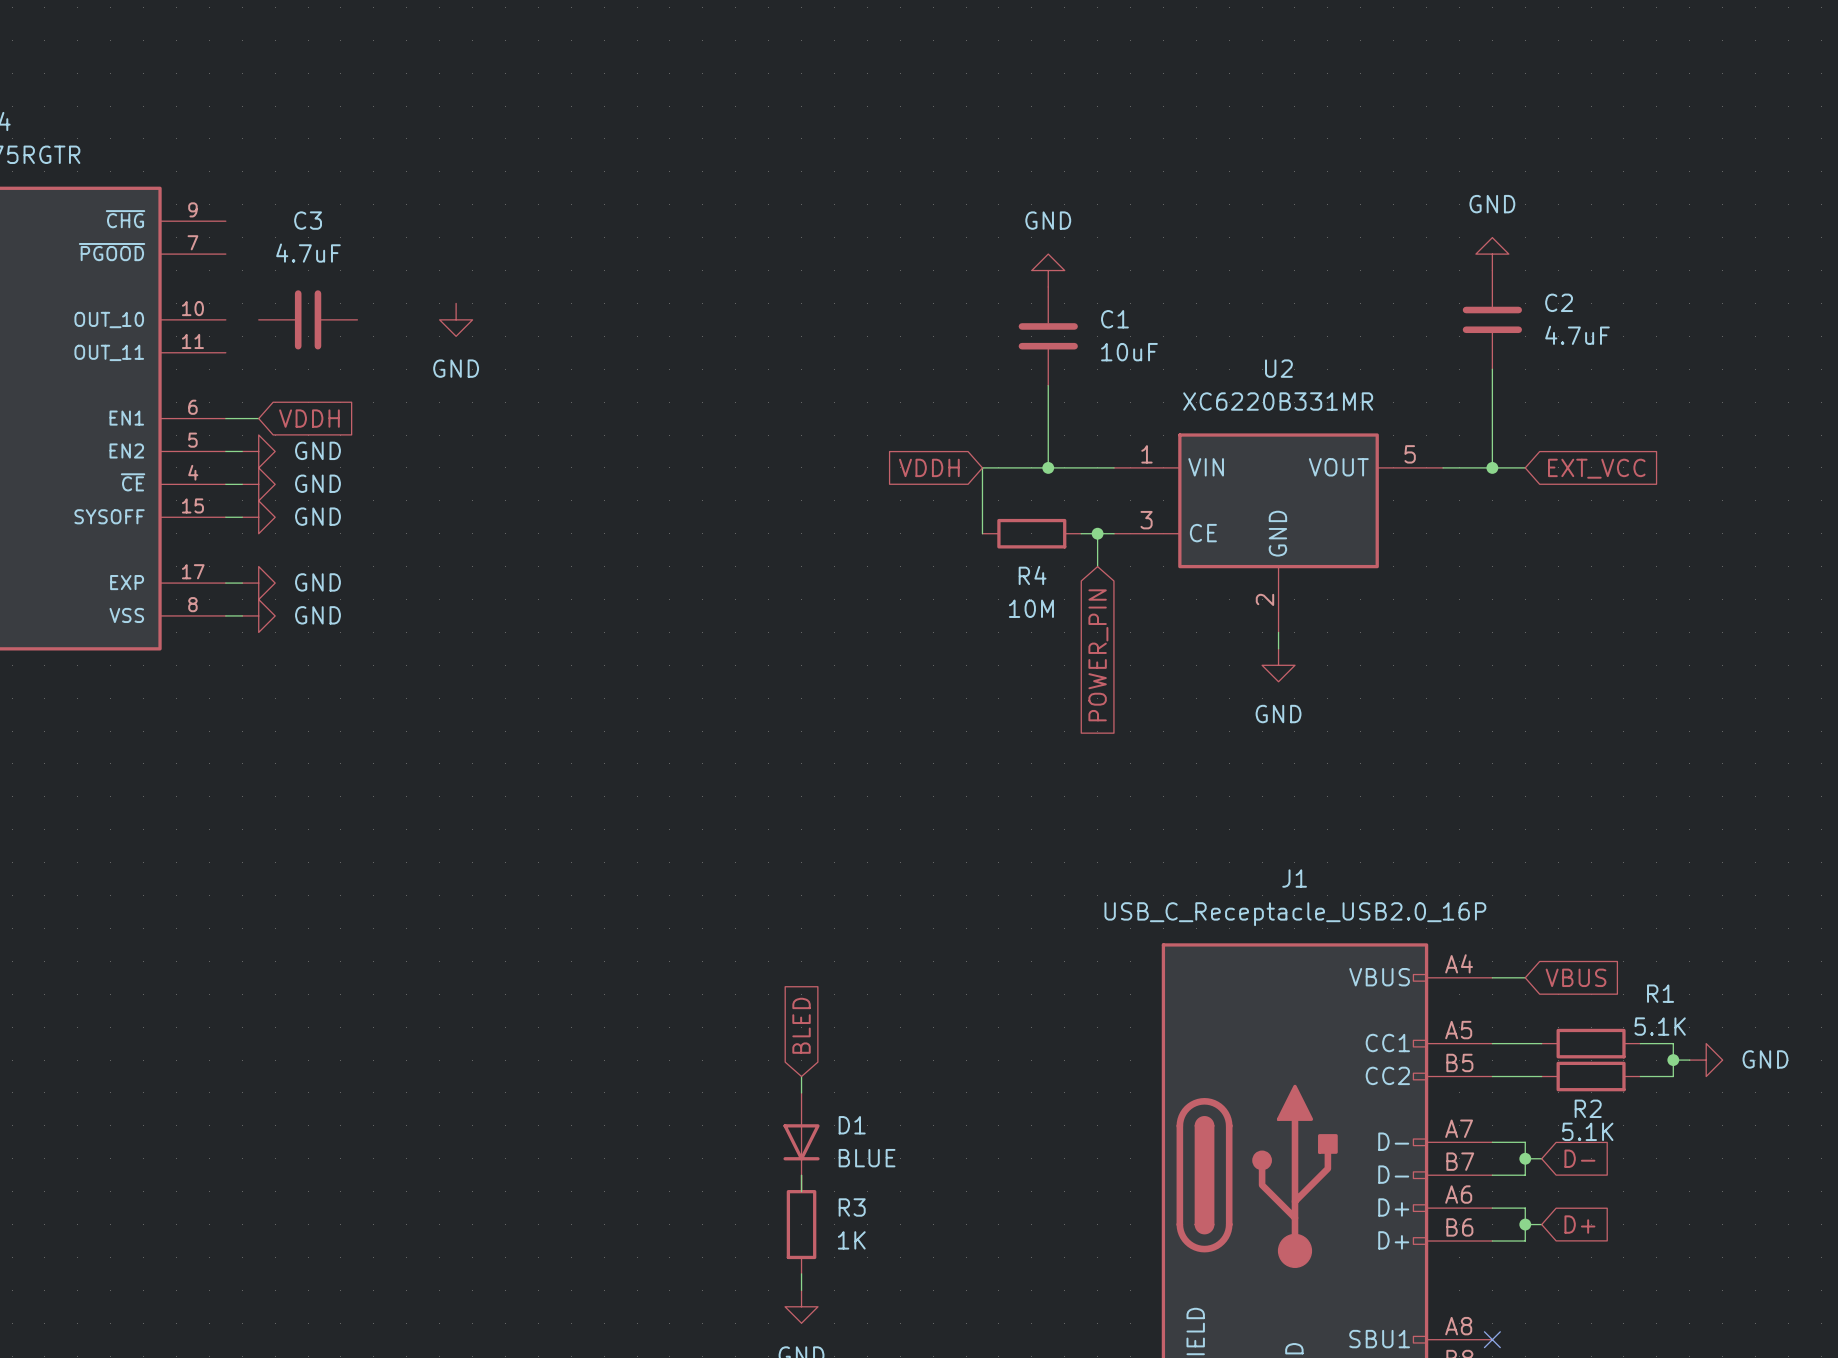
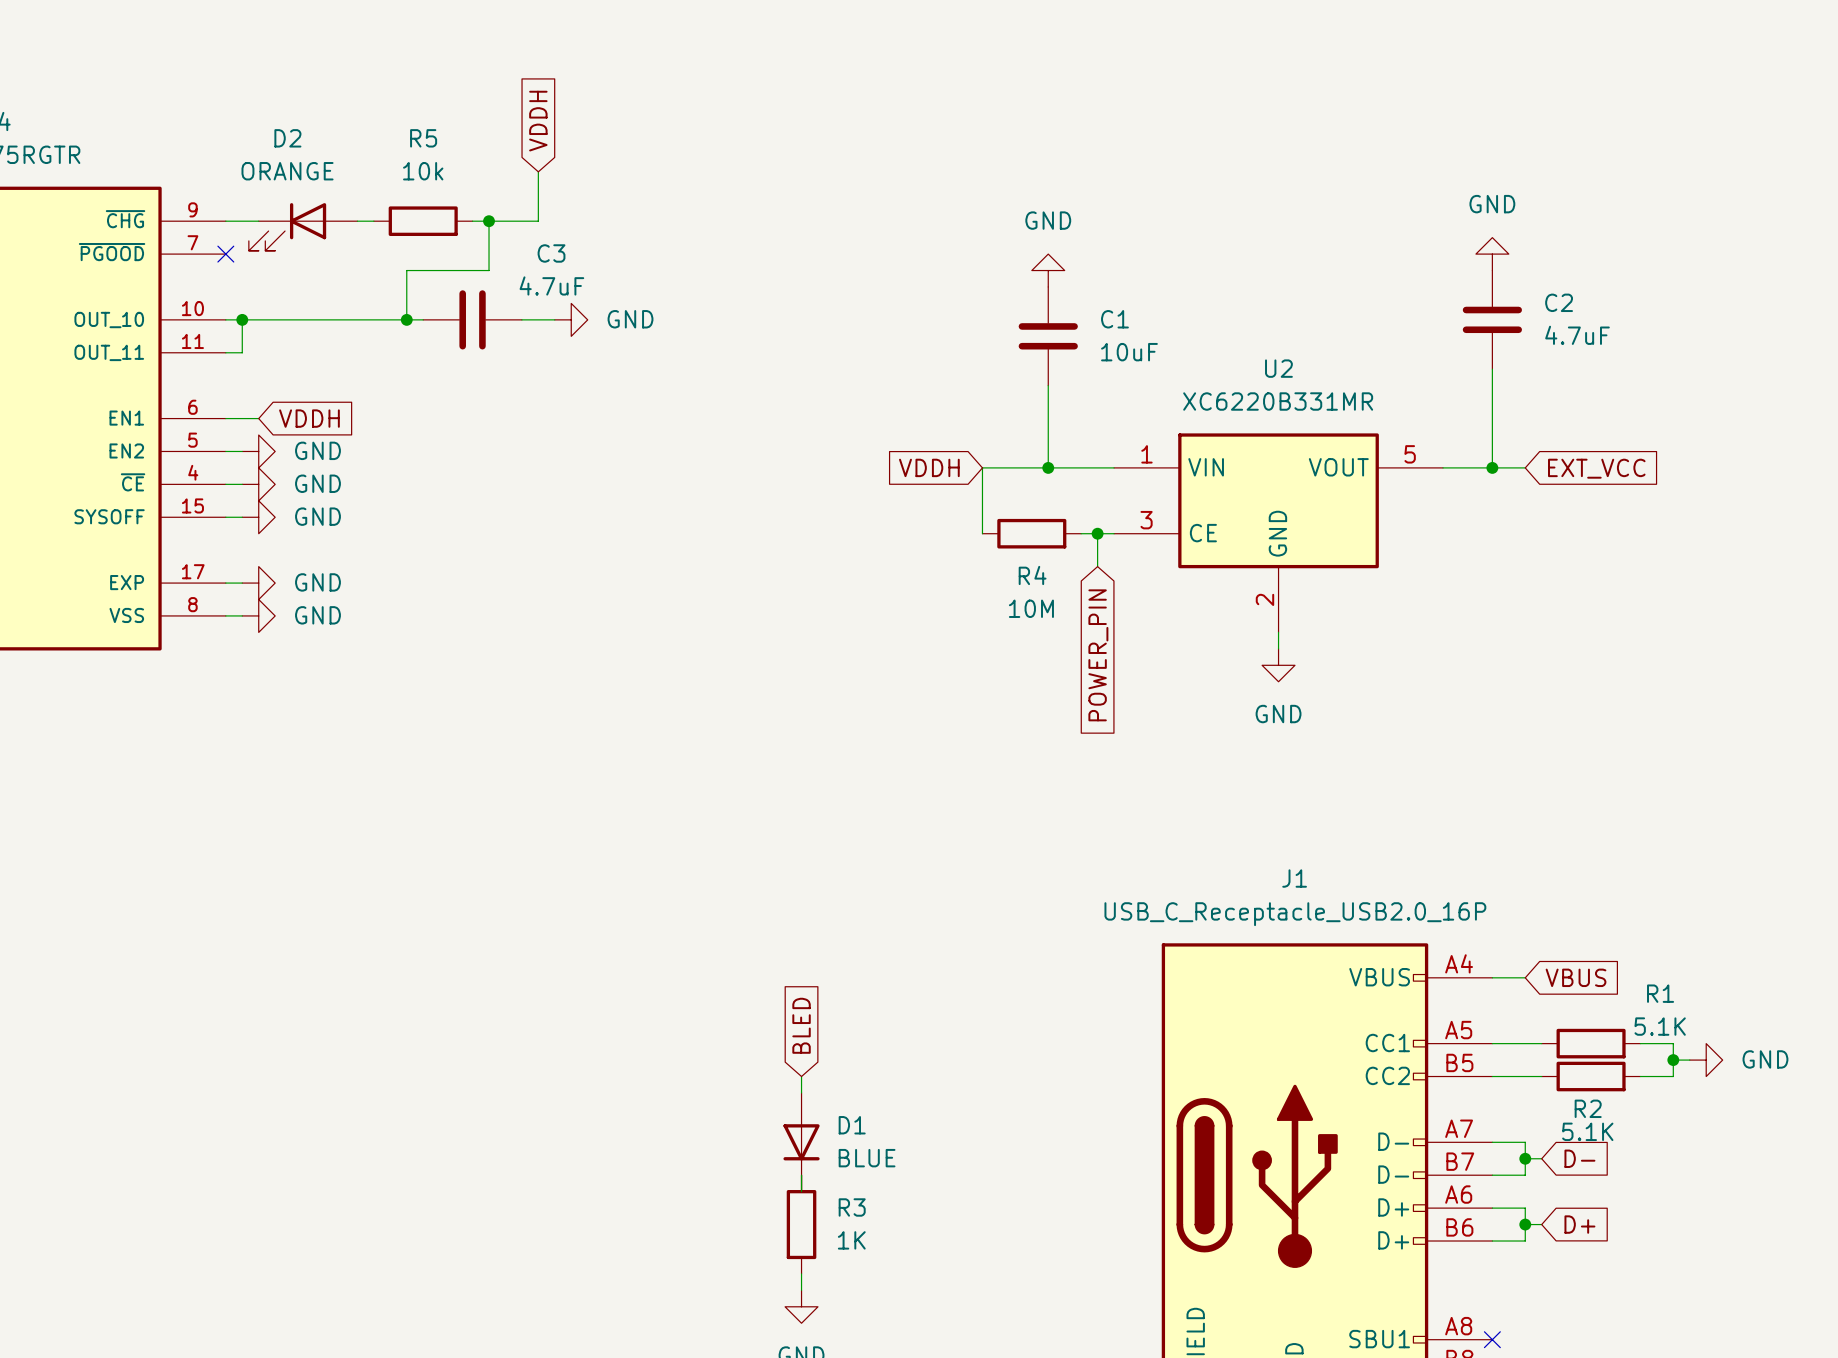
global label: none -> VDDH (538, 121)
wire: none -> (538, 171) (538, 221) (472, 221)
C3 name position: C3 (308, 220) -> C3 (551, 253)
wire: none -> (225, 221) (258, 221)
wire: none -> (357, 221) (373, 221)
R5: none -> 10k (423, 221)
wire: none -> (489, 221) (489, 270) (406, 270) (406, 319)
junction: none -> (489, 221)
D2: none -> ORANGE (303, 226)
C3 value position: 4.7uF (308, 253) -> 4.7uF (551, 285)
no-connect mark: none -> (225, 254)
wire: none -> (225, 319) (423, 319)
wire: none -> (242, 319) (242, 352) (225, 352)
junction: none -> (242, 319)
C3 position: (308, 319) -> (472, 319)
junction: none -> (406, 319)
power symbol rotation: 0° (456, 319) -> 90° counterclockwise (571, 319)
power symbol position: GND (456, 319) -> GND (571, 319)
wire: none -> (521, 319) (554, 319)

